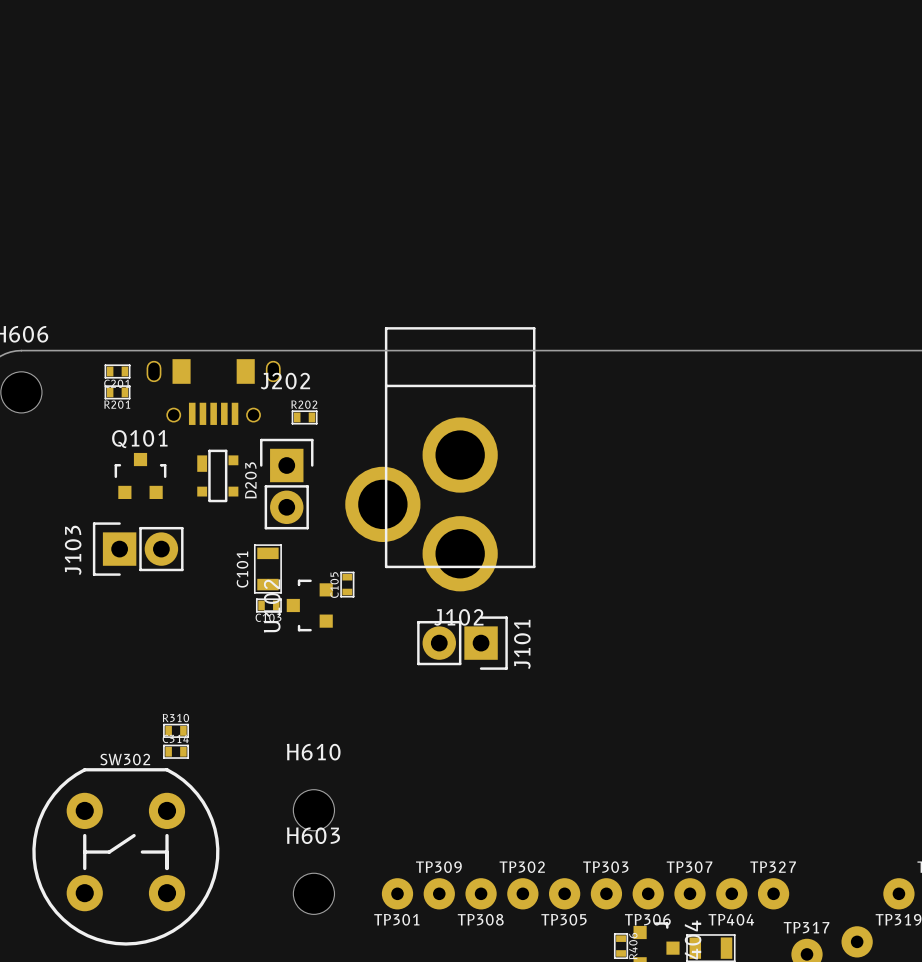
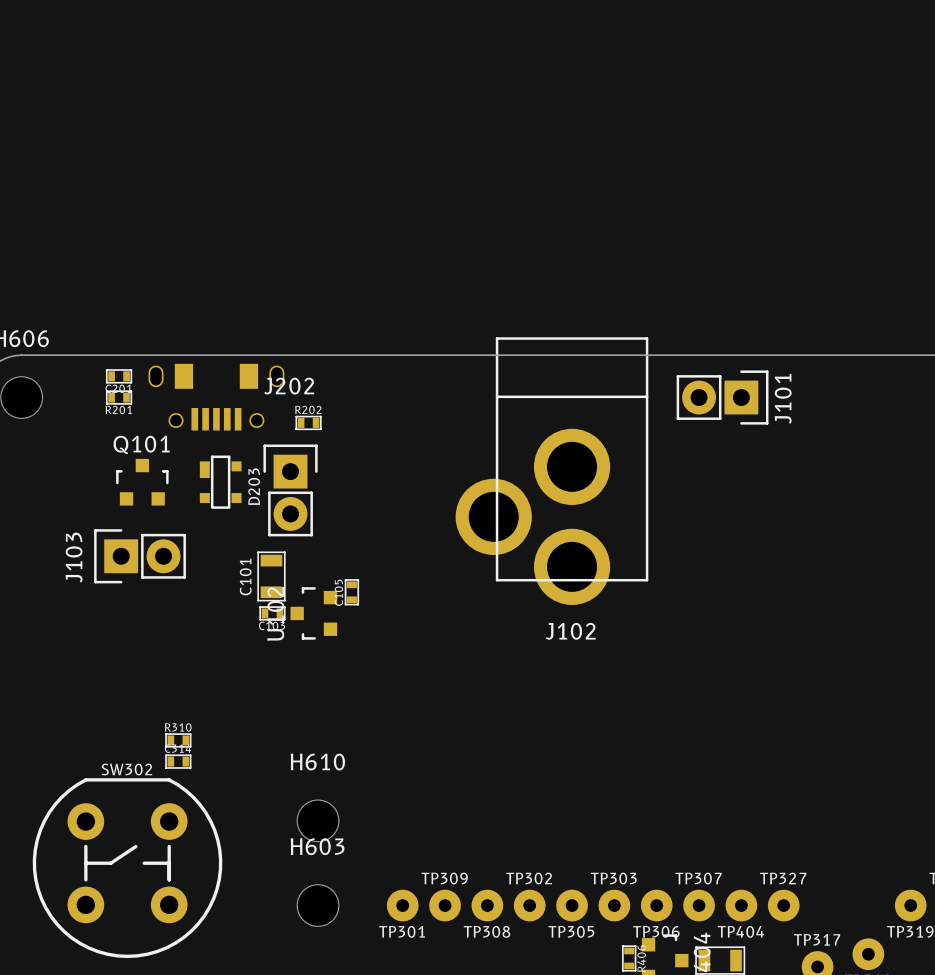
J102 position: (440, 459) -> (551, 471)
J101 position: (462, 643) -> (722, 397)

